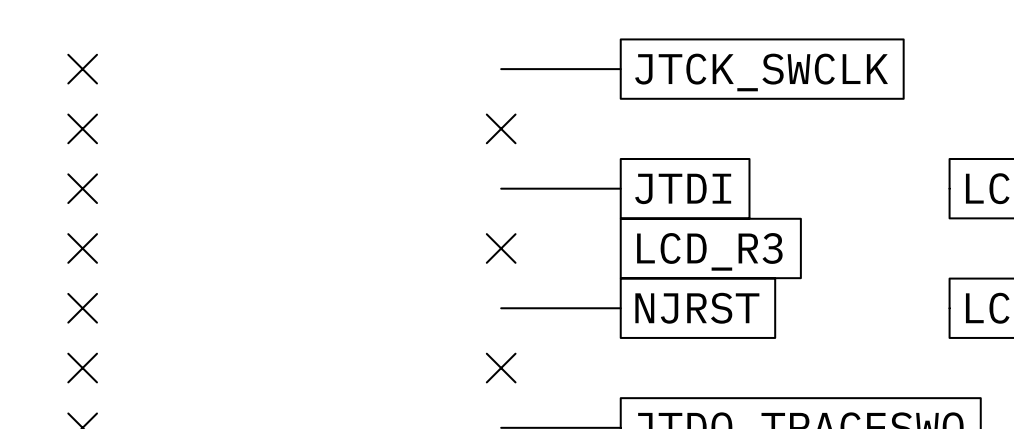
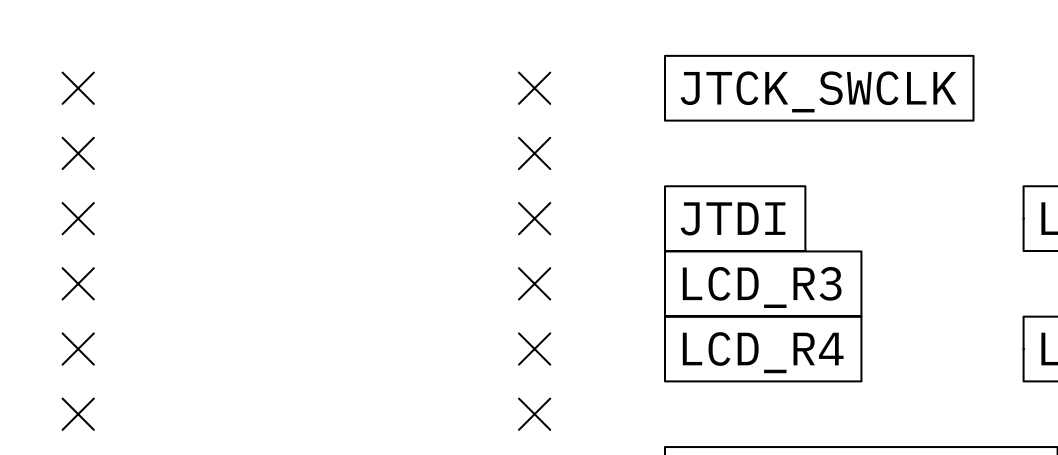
wire: (501, 69) (620, 69) -> none
no-connect mark: none -> (534, 88)
wire: (501, 188) (620, 188) -> none
no-connect mark: none -> (534, 218)
wire: (501, 308) (620, 308) -> none
no-connect mark: none -> (534, 349)
global label: NJRST (697, 308) -> LCD_R4 (763, 352)

